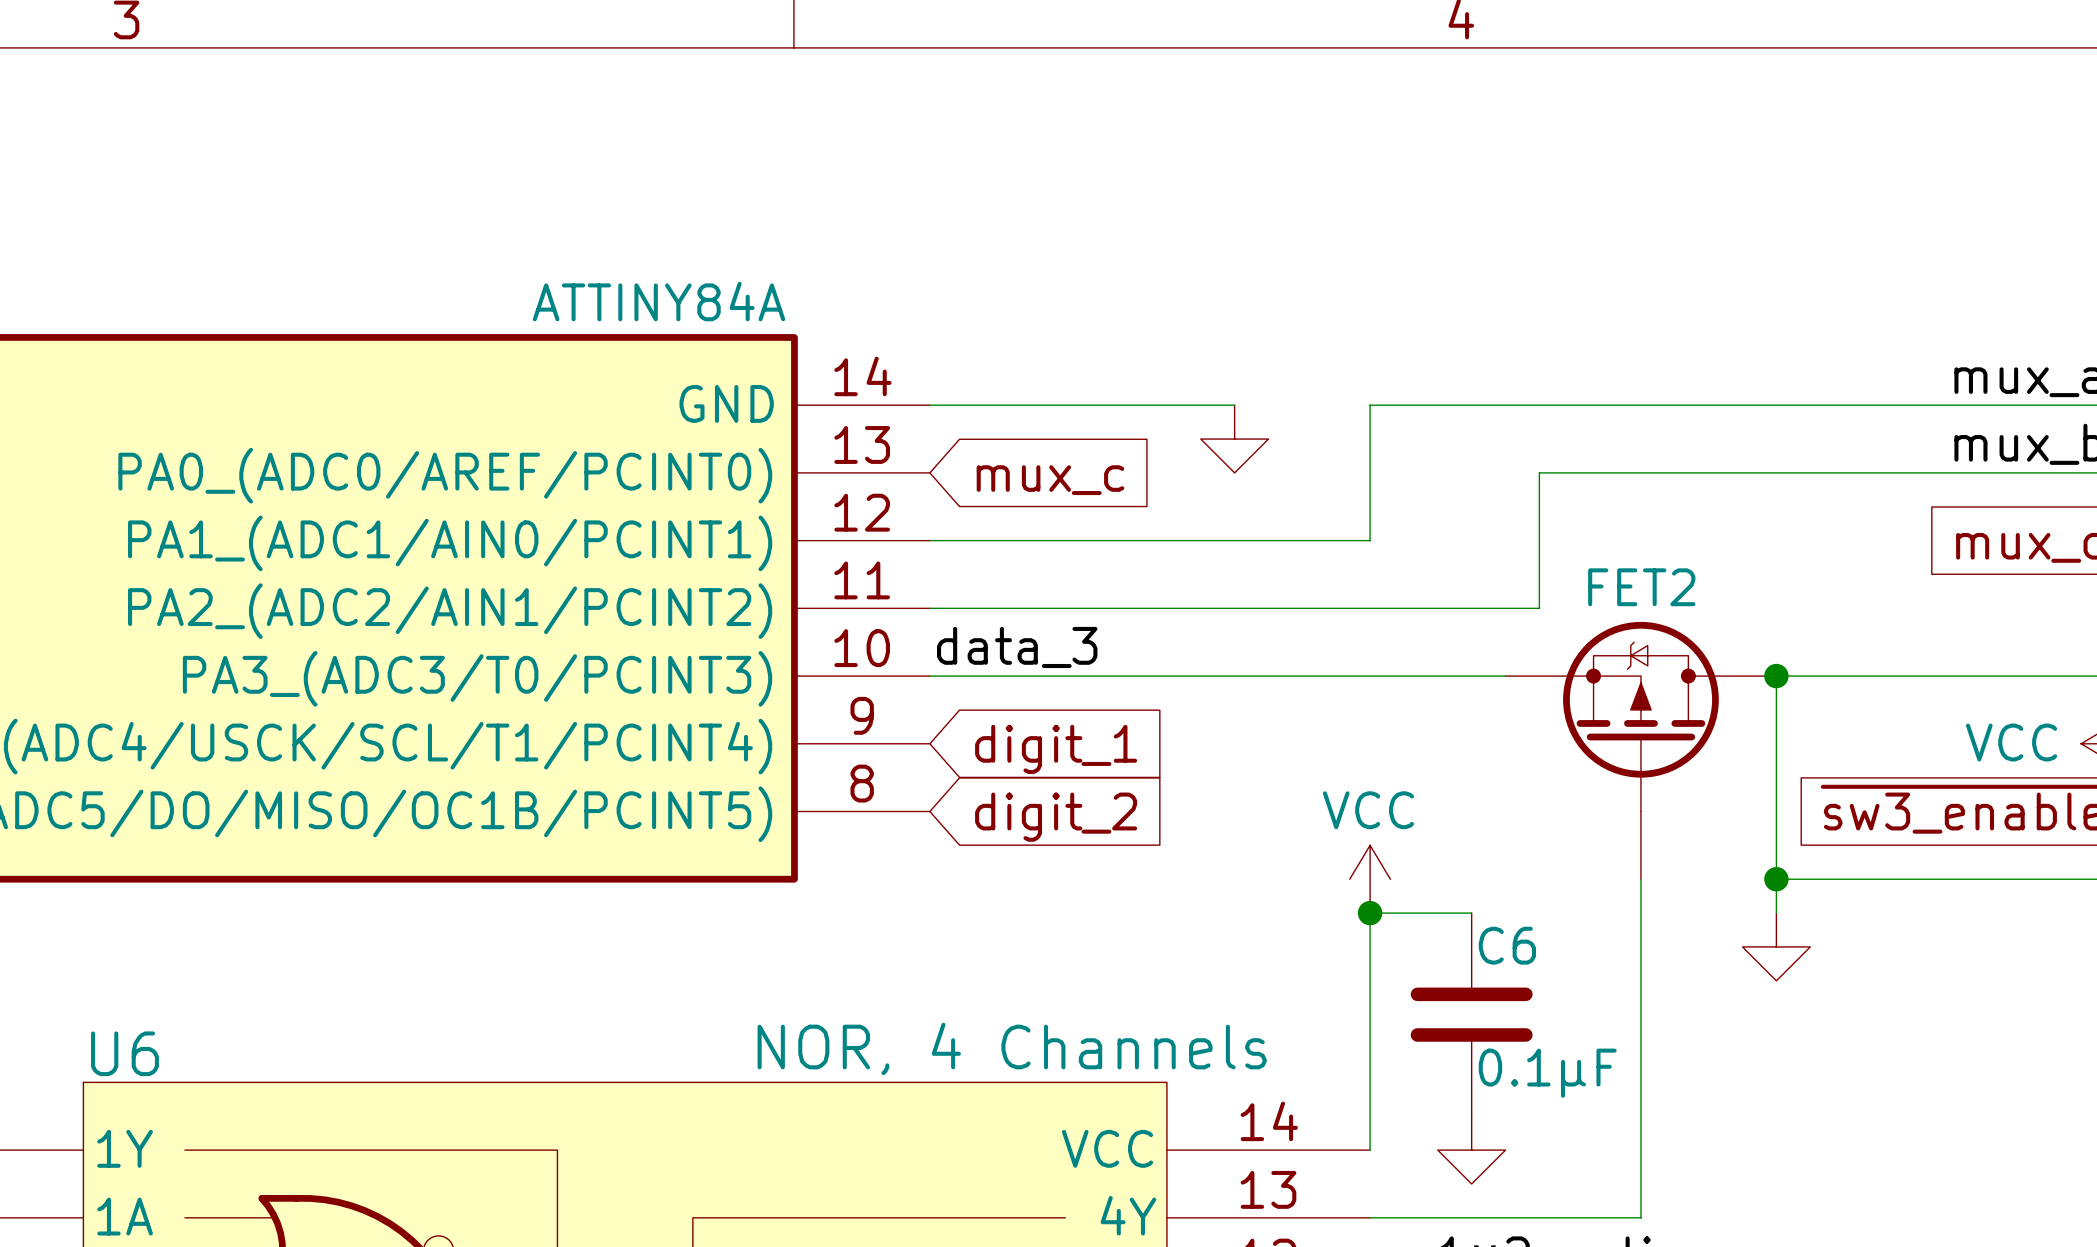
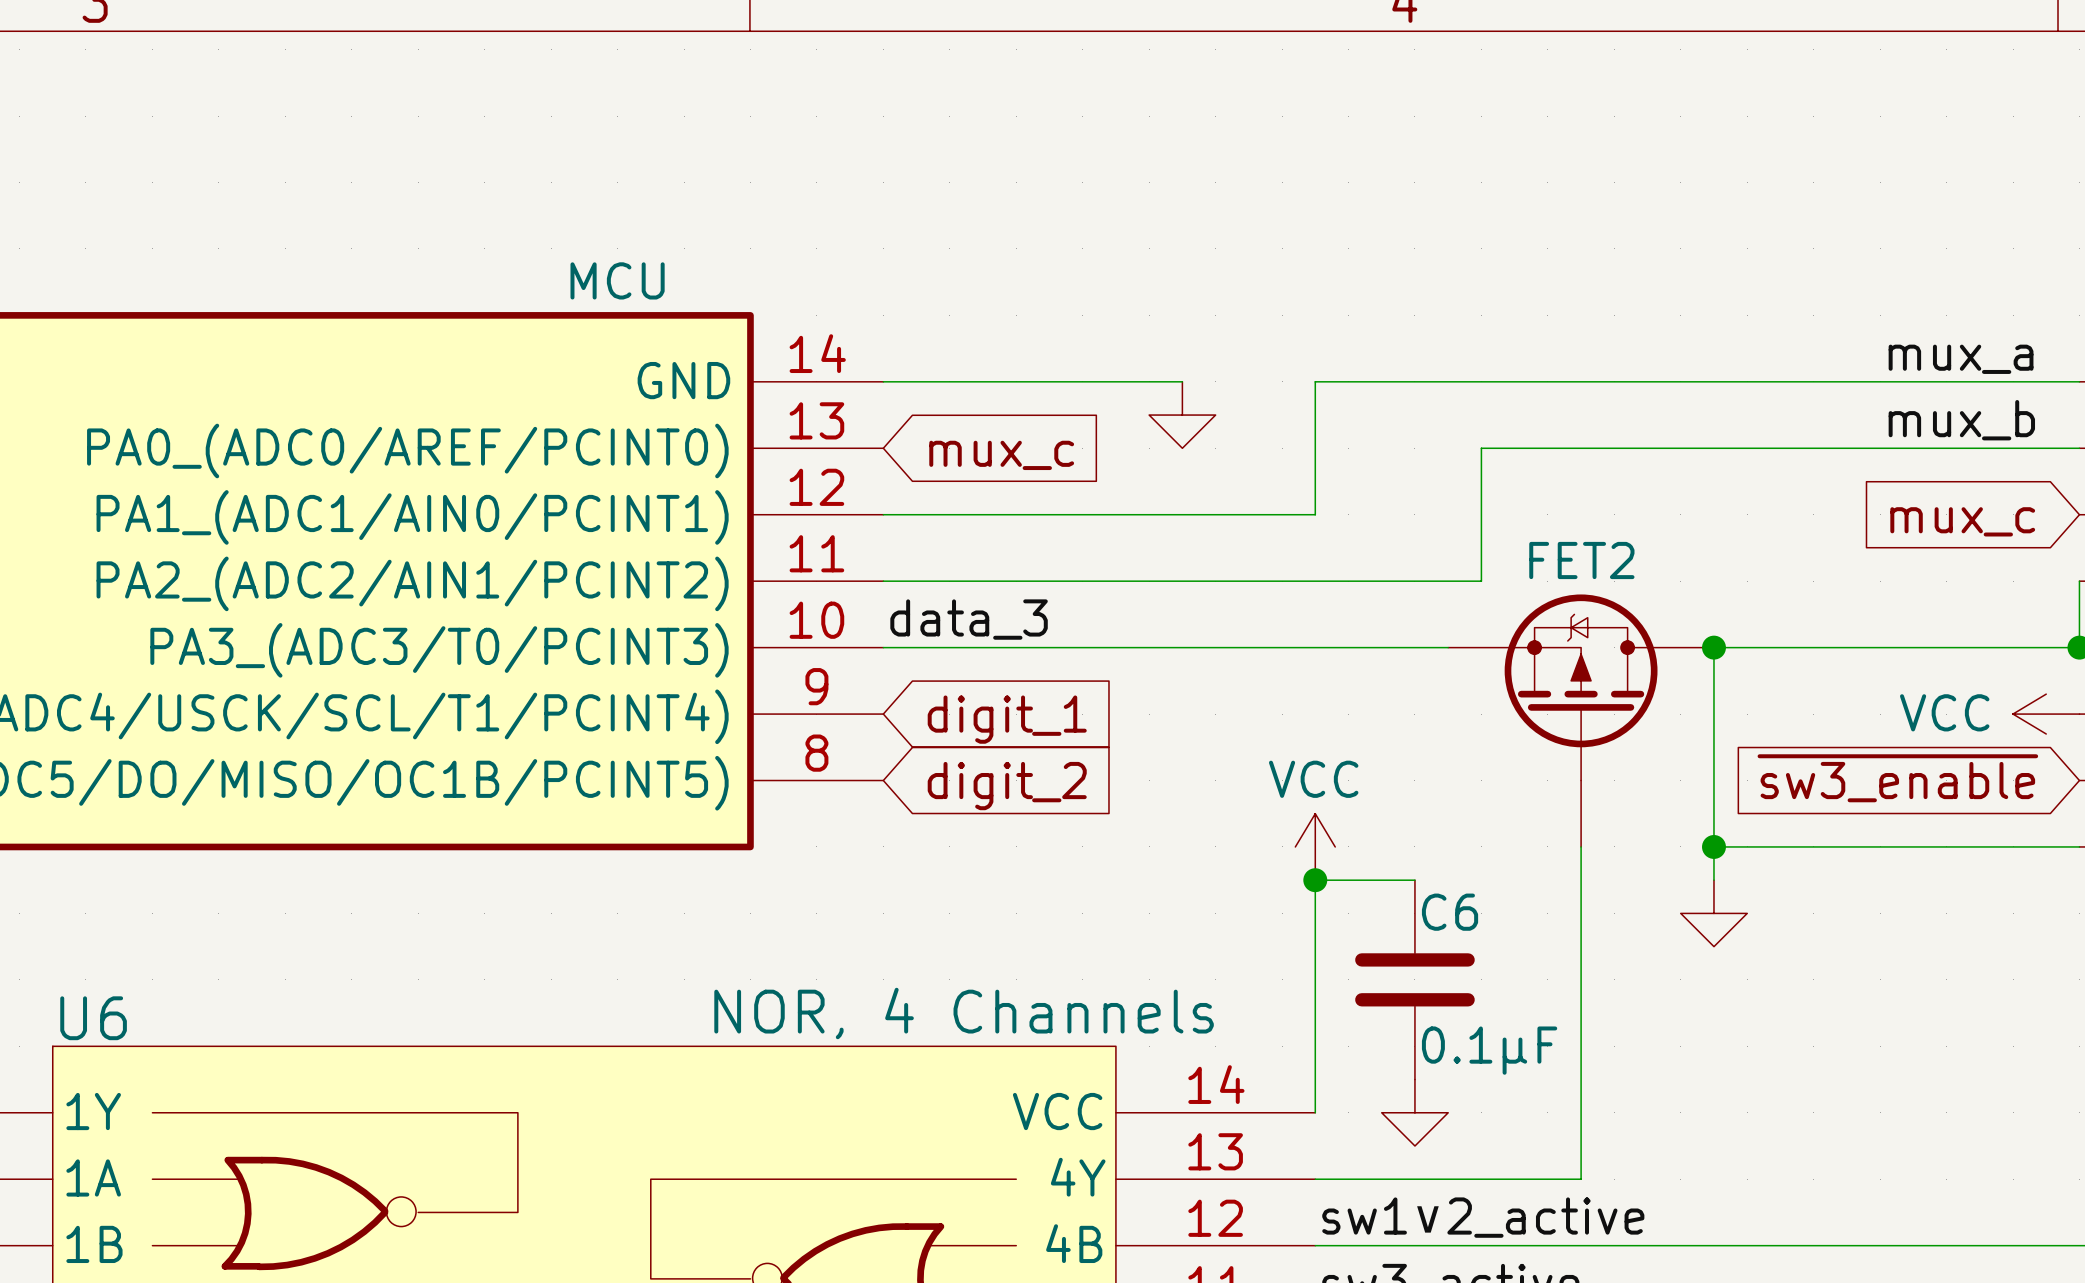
part text: ATTINY84A (659, 301) -> none
part value: none -> MCU (617, 280)
C6 value: 0.1µF (1547, 1073) -> none
C6 text: none -> 0.1µF (1489, 1050)

